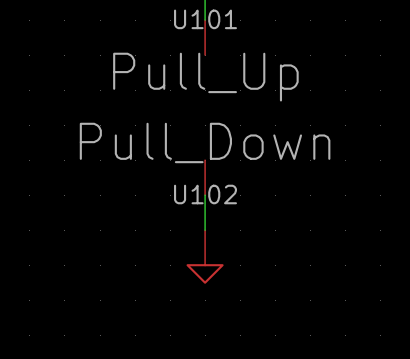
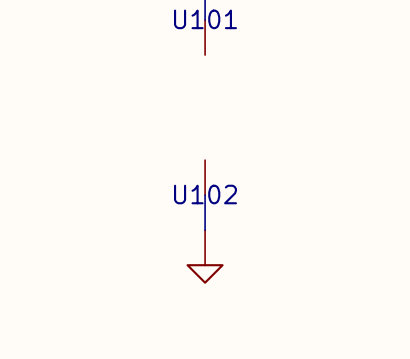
U101 value: Pull_Up (205, 77) -> none
U102 value: Pull_Down (205, 142) -> none

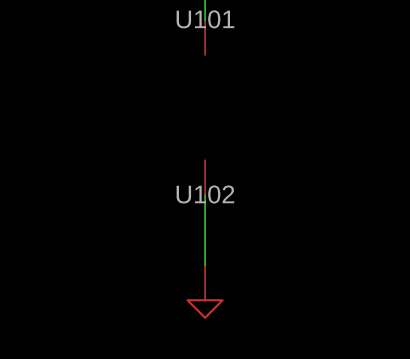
power symbol position: (205, 256) -> (205, 292)

